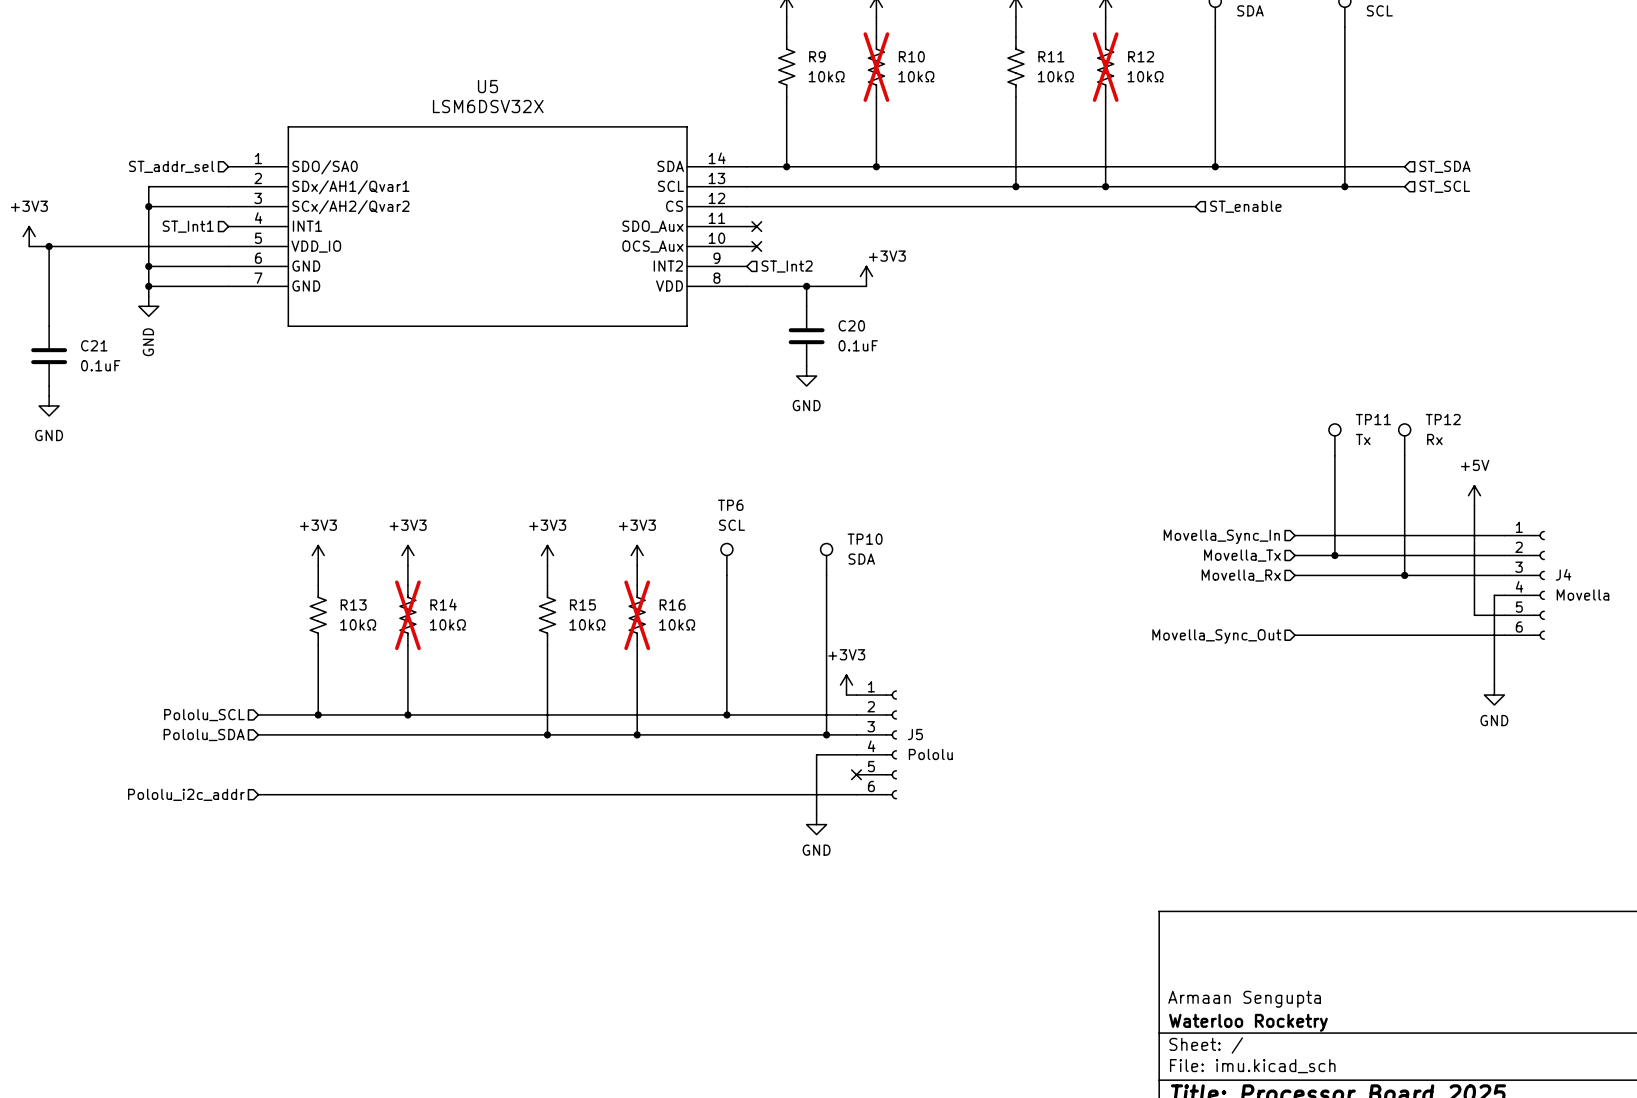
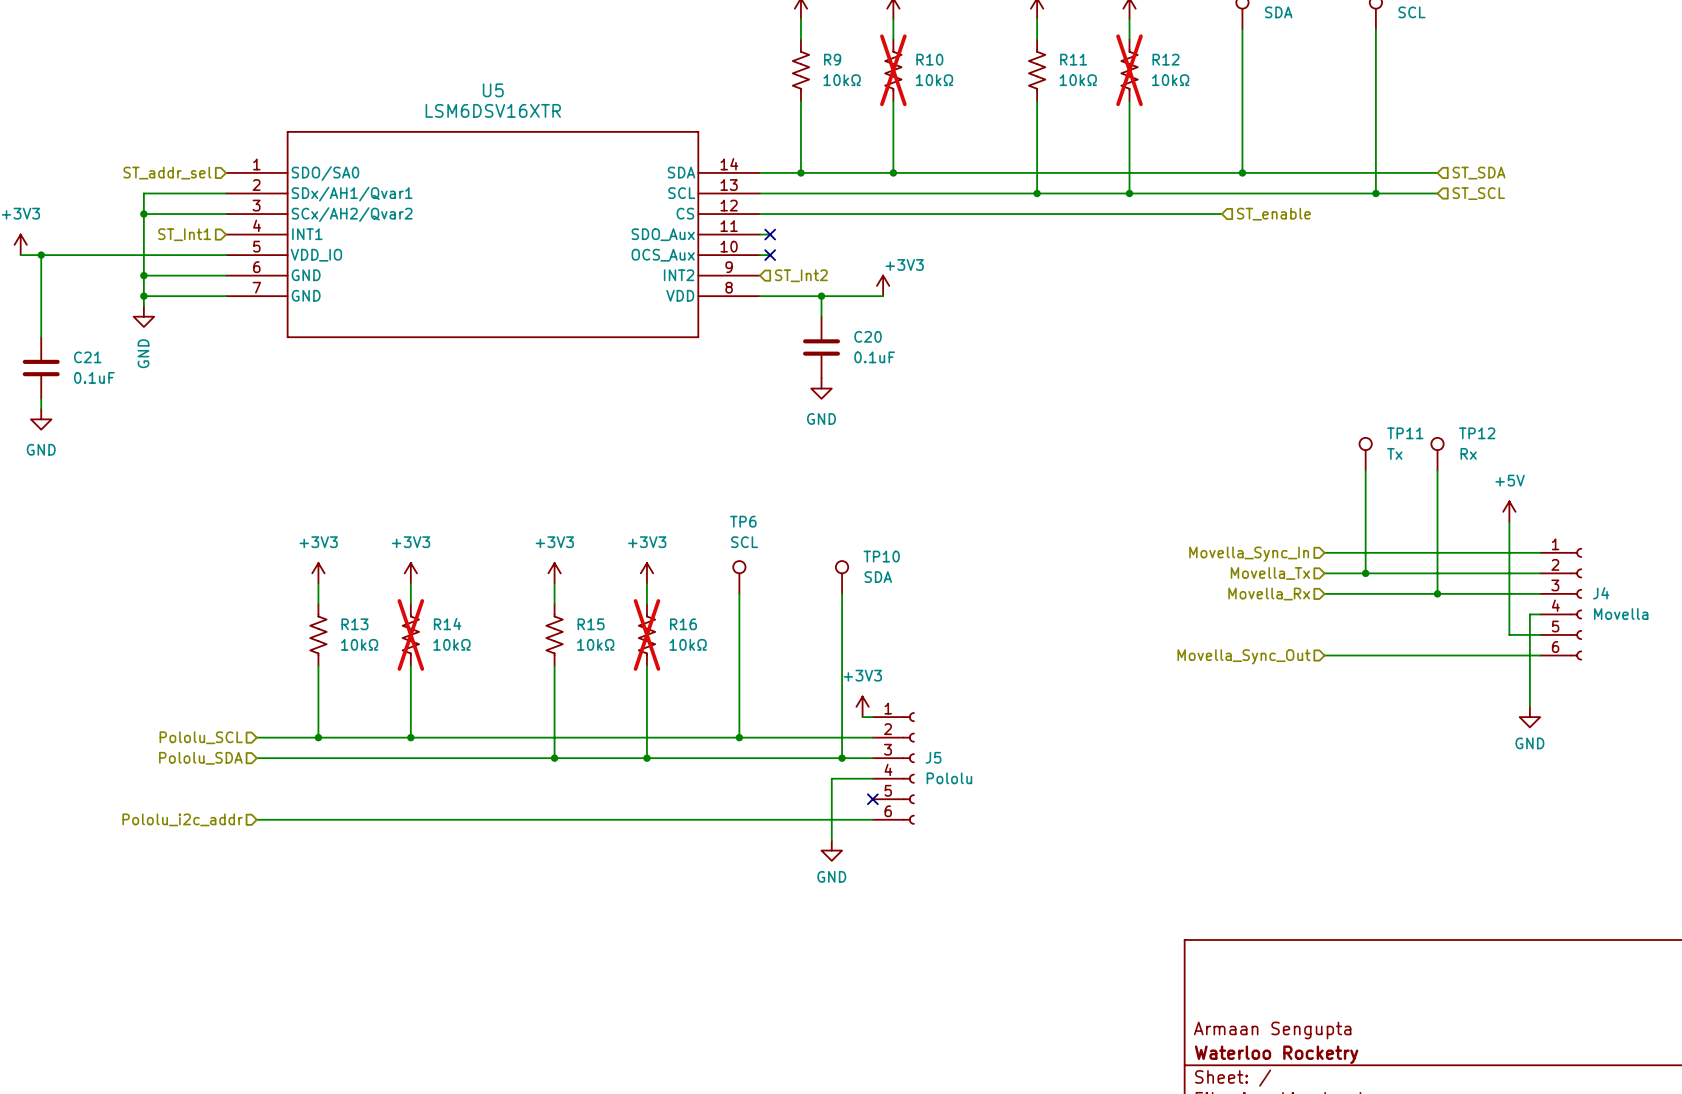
U5 value: LSM6DSV32X (488, 106) -> LSM6DSV16XTR (493, 110)

